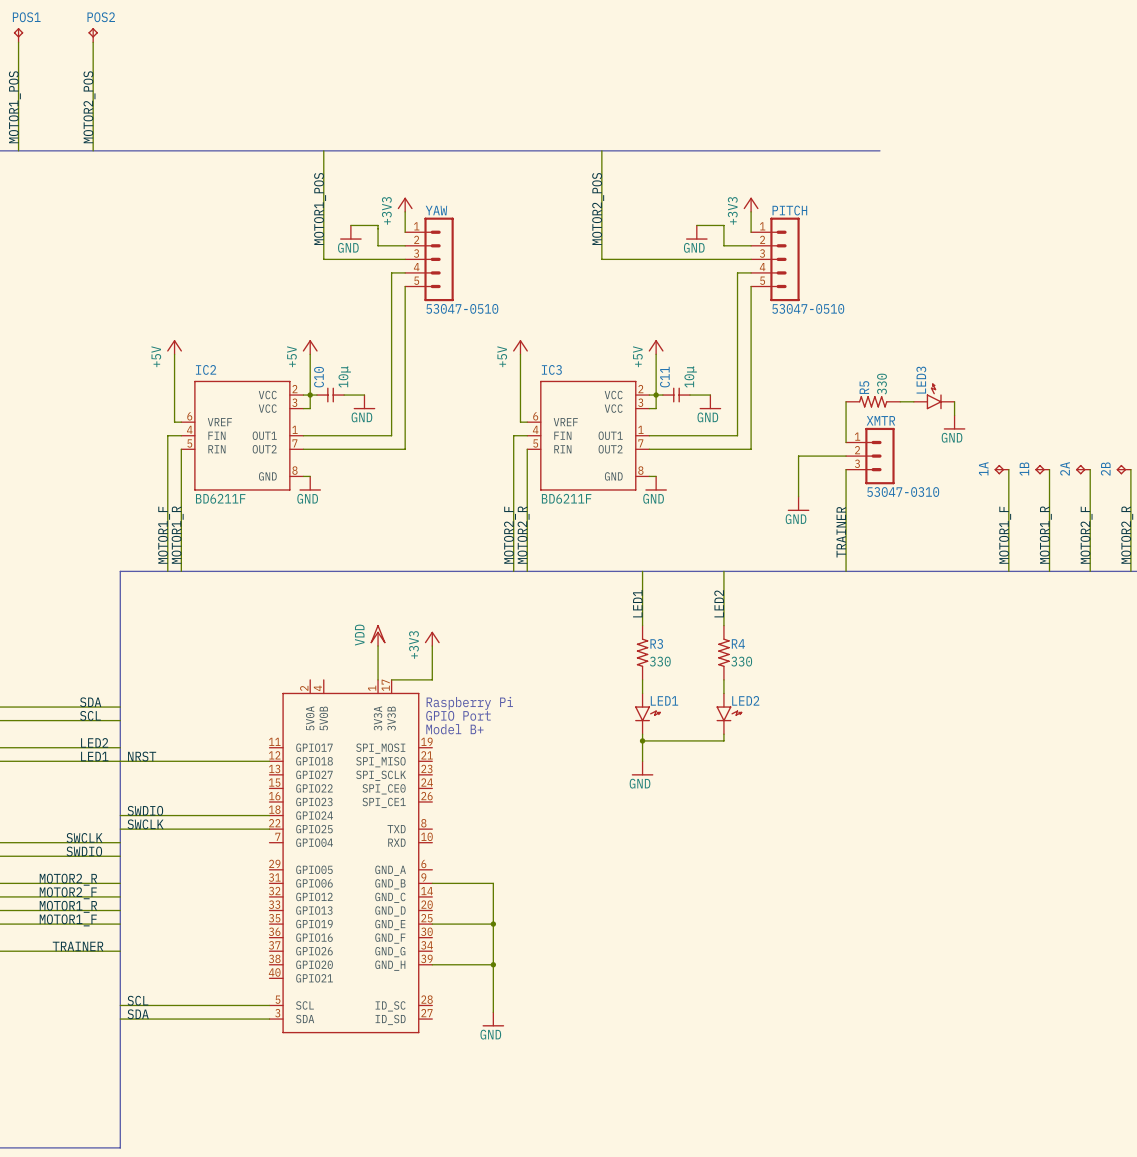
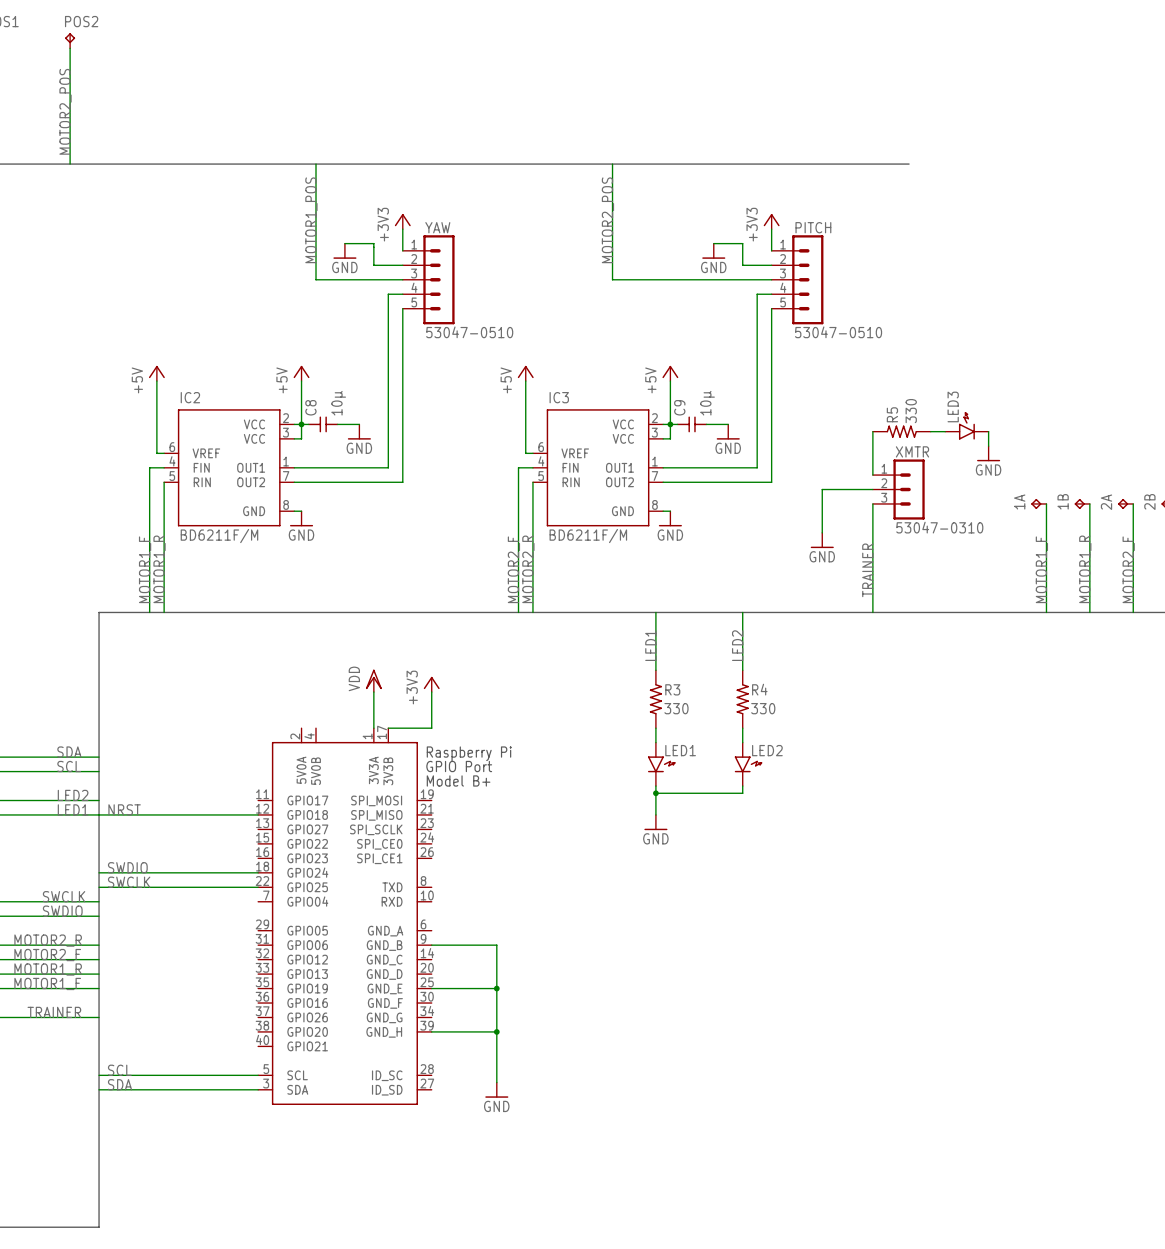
C10 name: C10 (319, 377) -> C8 (310, 407)
C11 name: C11 (664, 377) -> C9 (679, 407)
IC2 value: BD6211F (220, 498) -> BD6211F/M (219, 536)
IC3 value: BD6211F (566, 498) -> BD6211F/M (588, 536)

